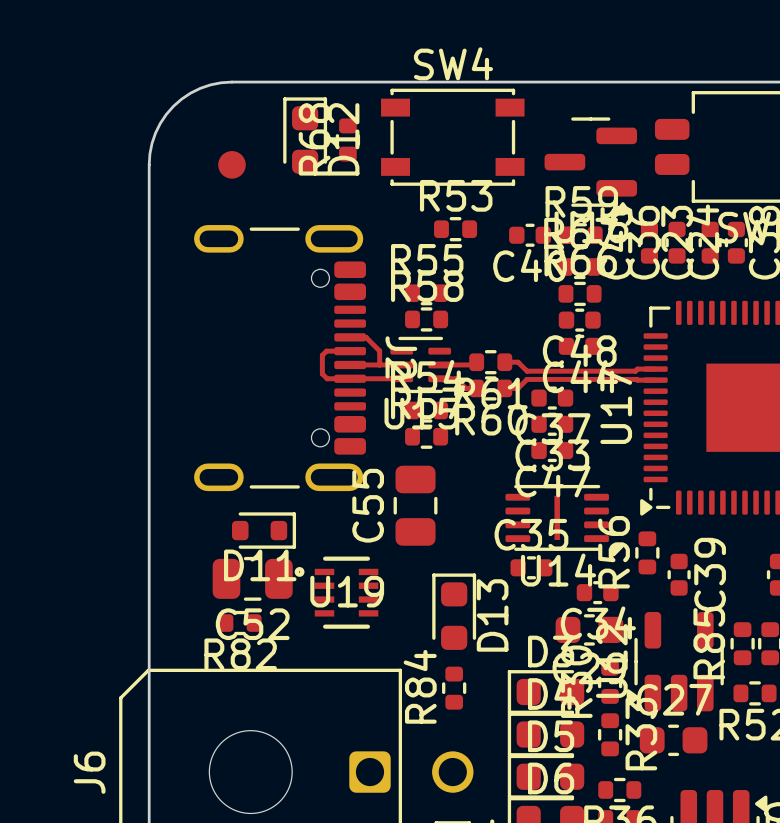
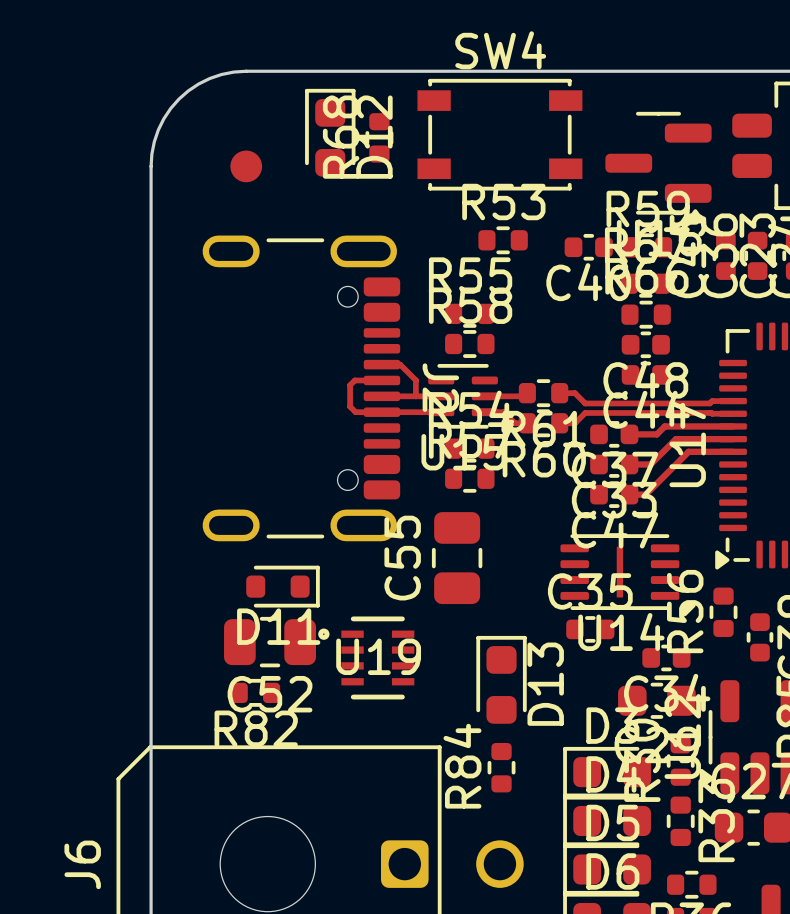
track: none -> (733, 426) (664, 426) (656, 434) (629, 434)
track: none -> (733, 439) (675, 439) (650, 464) (629, 464)
track: none -> (733, 451) (688, 451) (645, 494) (629, 494)

